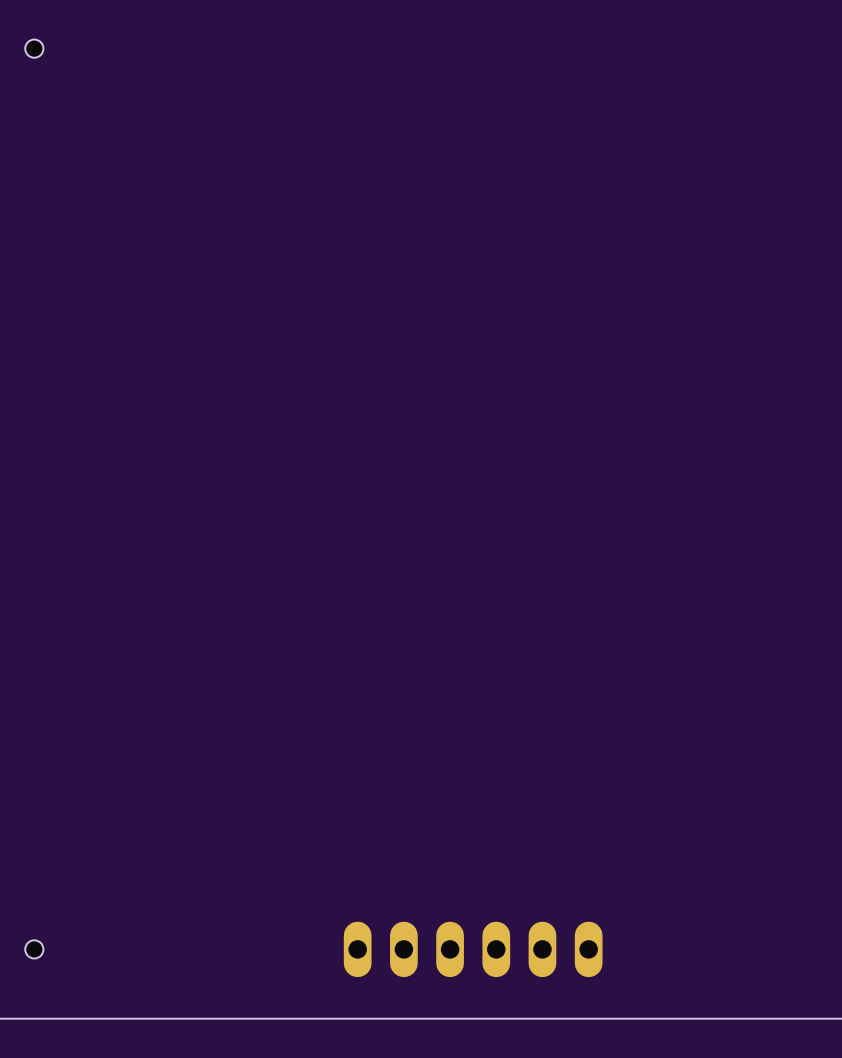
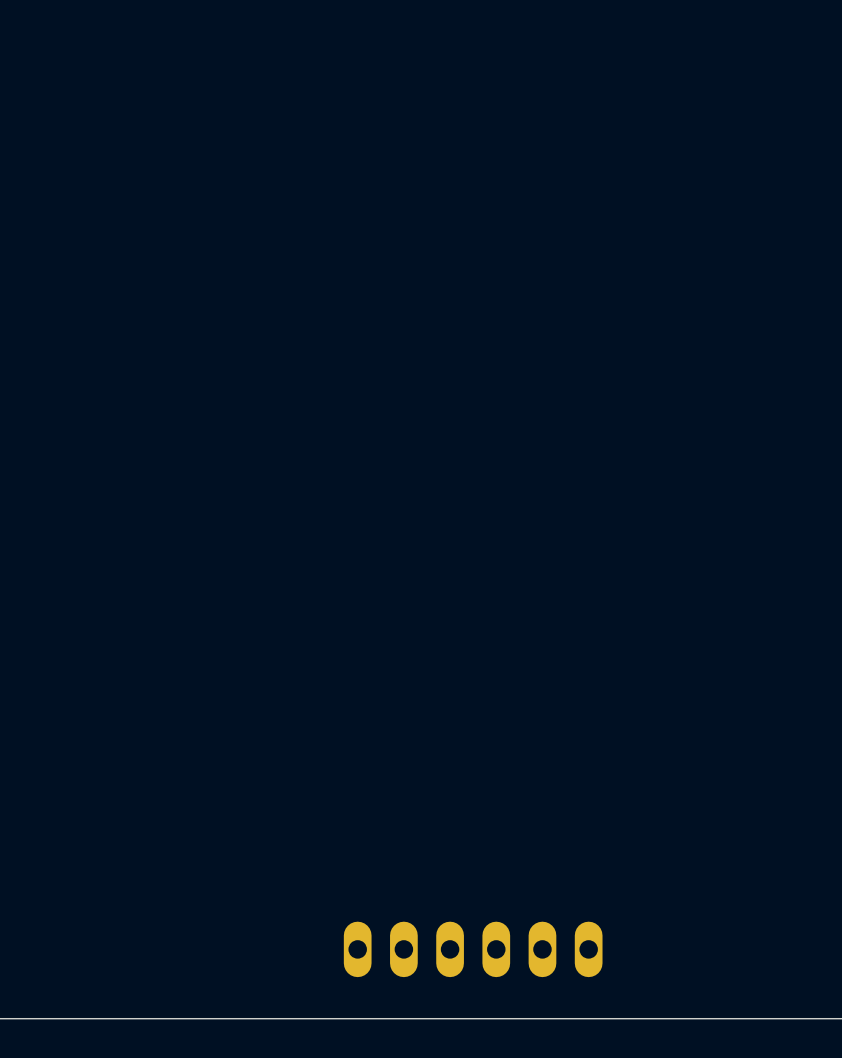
hole: (34, 48) -> none
hole: (34, 949) -> none

